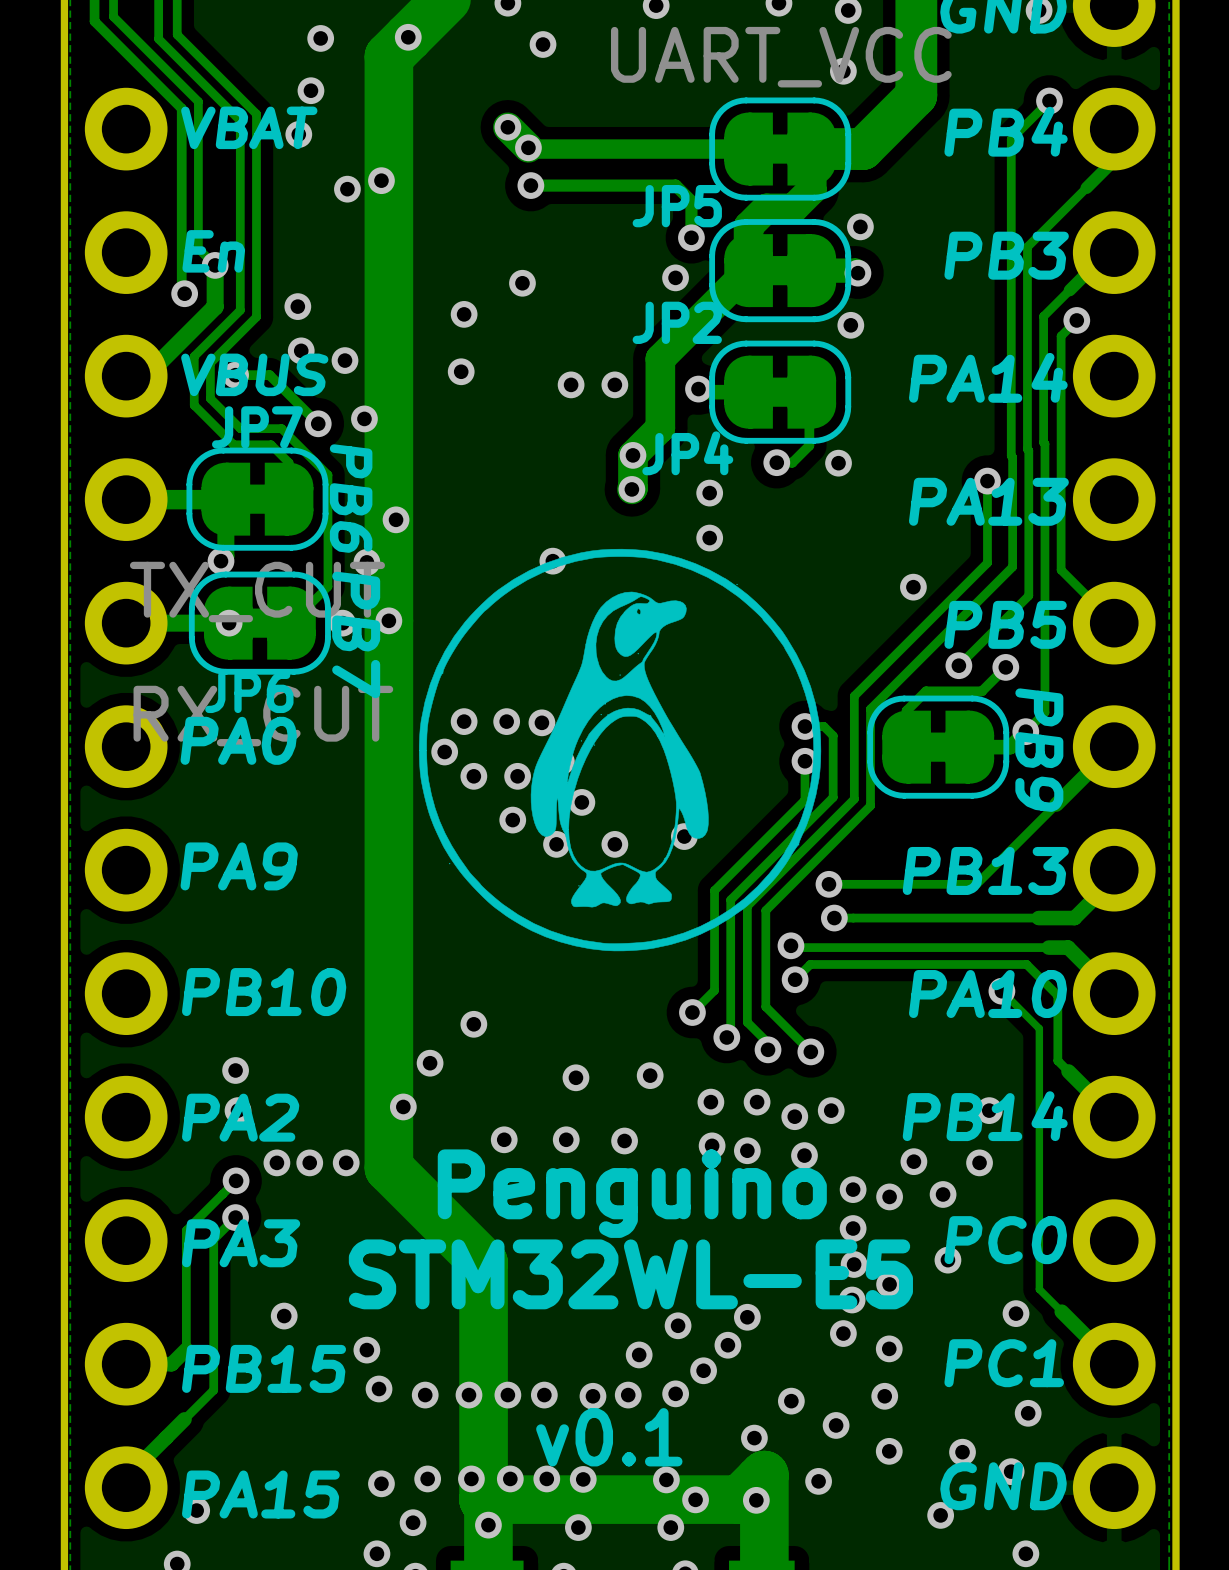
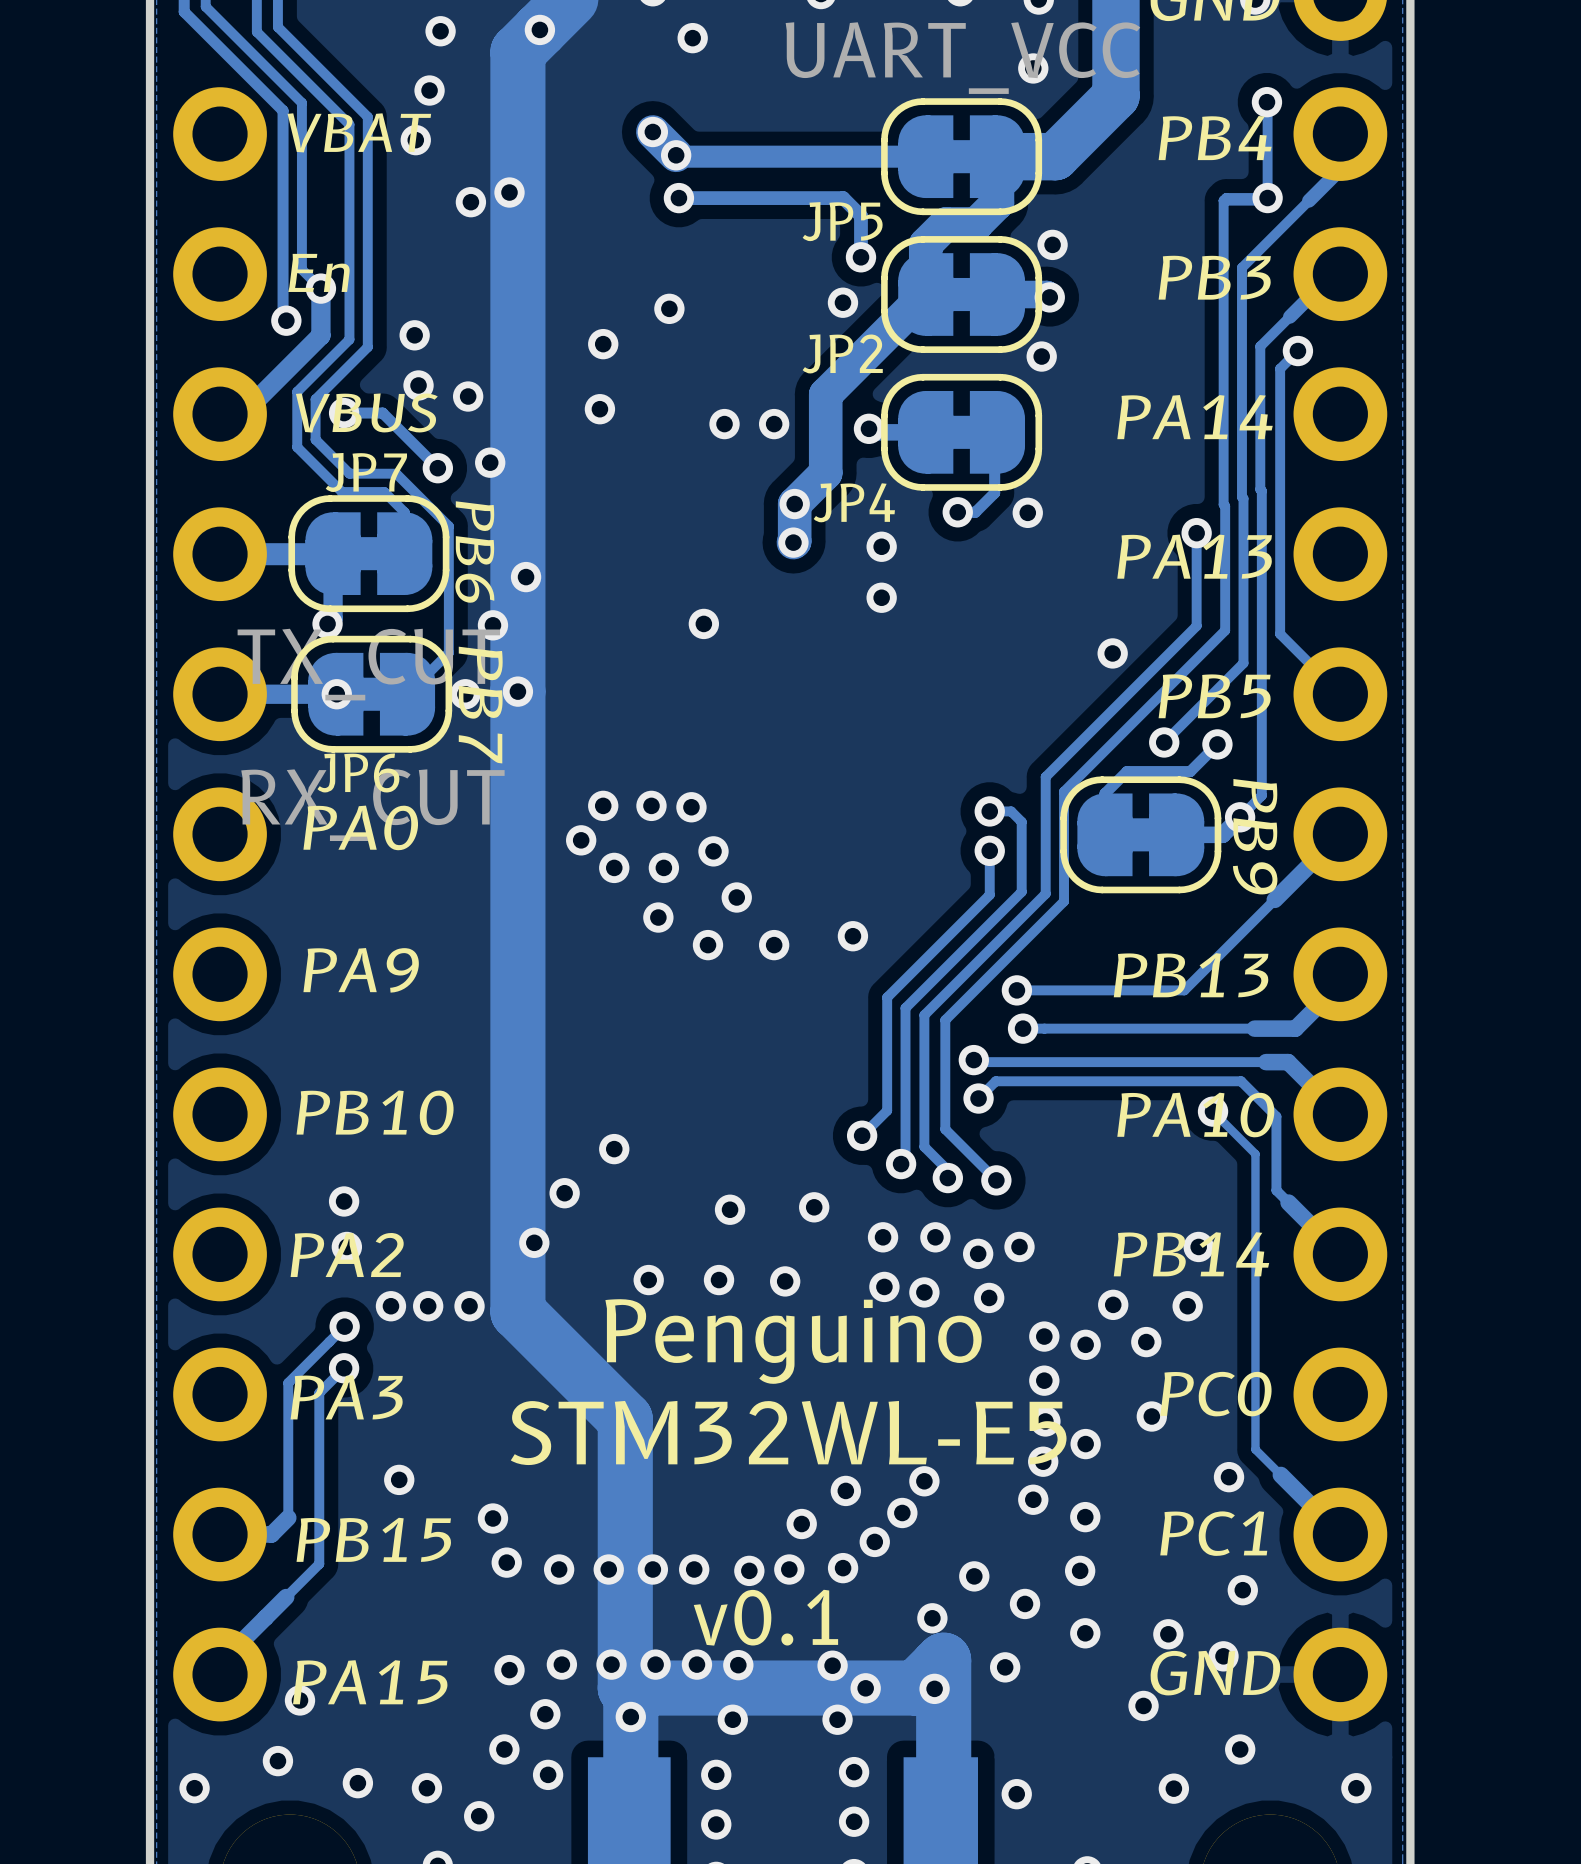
track: (1049, 100) (1011, 139) (1011, 187) -> (1267, 102) (1267, 198)
track: none -> (1267, 198) (1226, 198) (1223, 200) (1264, 200) (1267, 198)
via: none -> (1267, 198)
drawing: [419, 548, 822, 952] -> none

